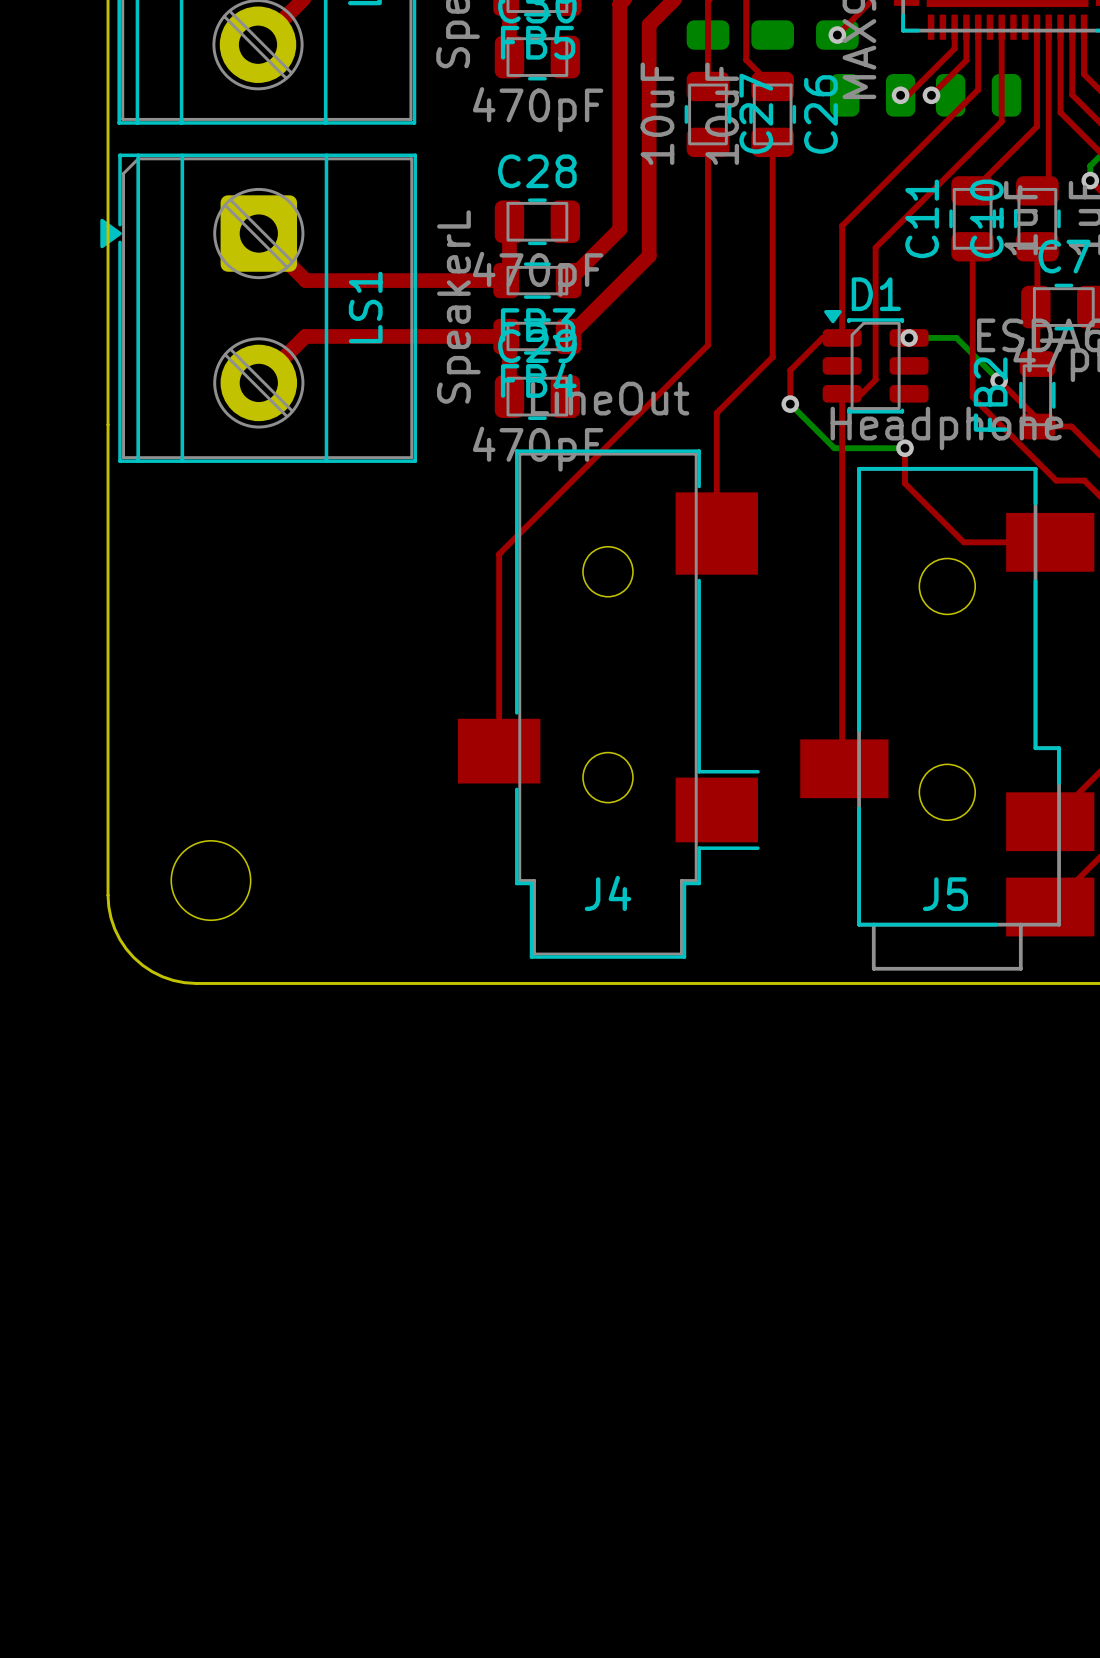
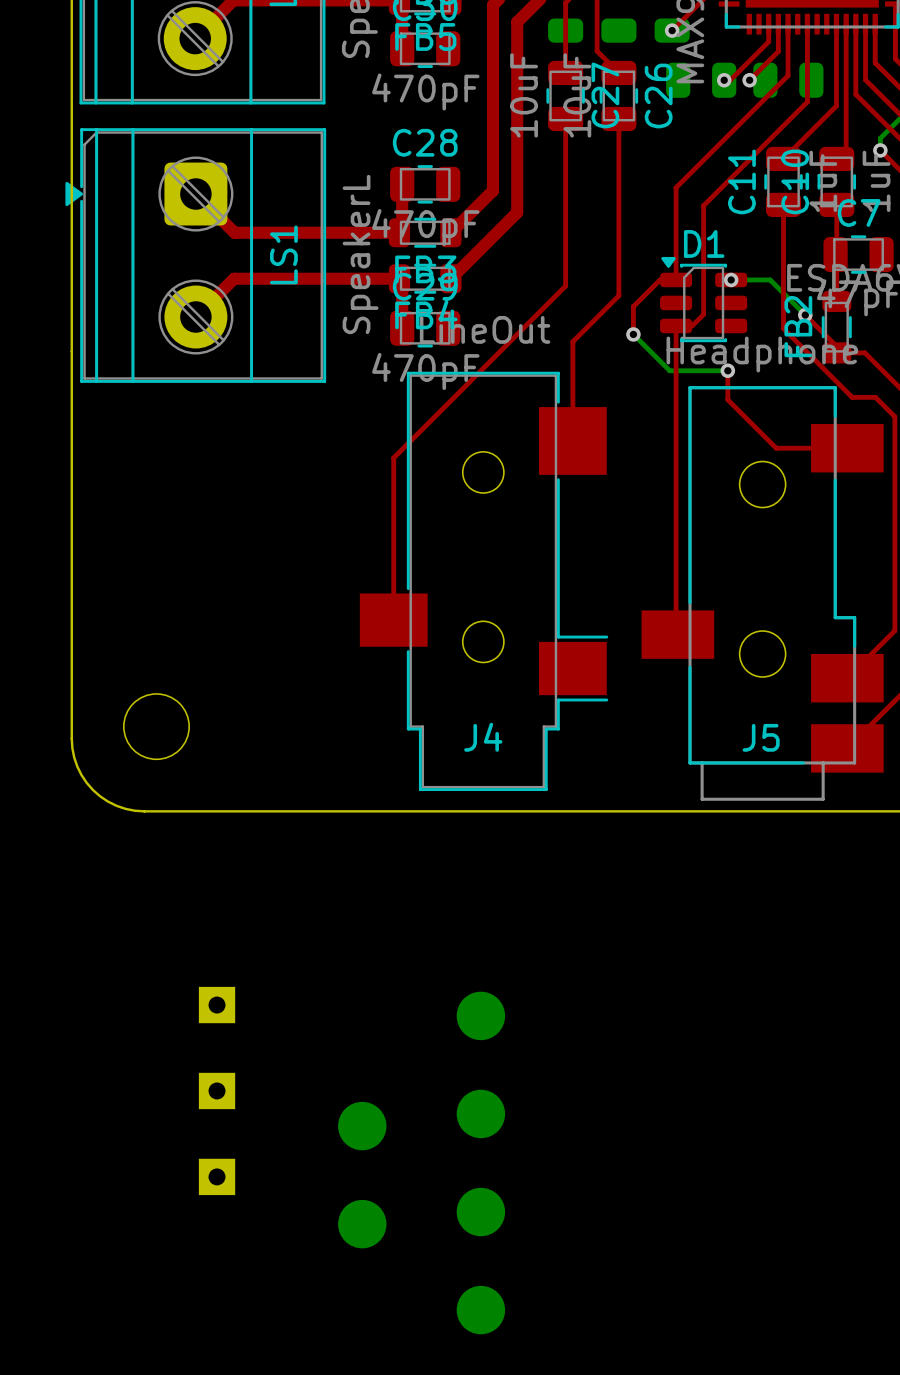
part: none -> (217, 1005)
part: none -> (480, 1015)
part: none -> (217, 1090)
part: none -> (480, 1113)
part: none -> (362, 1126)
part: none -> (217, 1176)
part: none -> (480, 1212)
part: none -> (362, 1224)
part: none -> (480, 1310)

